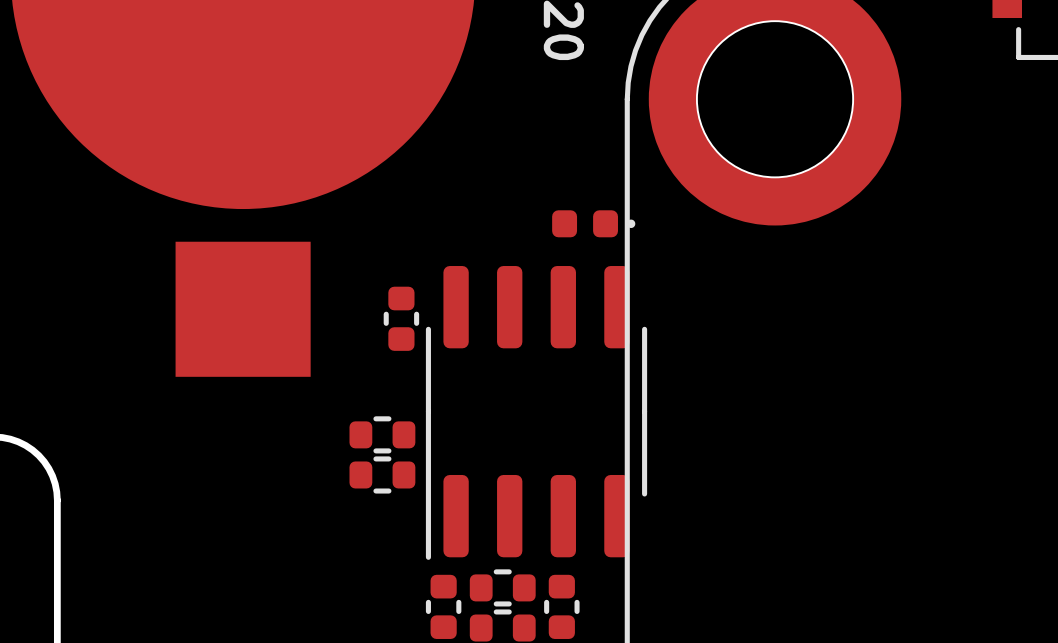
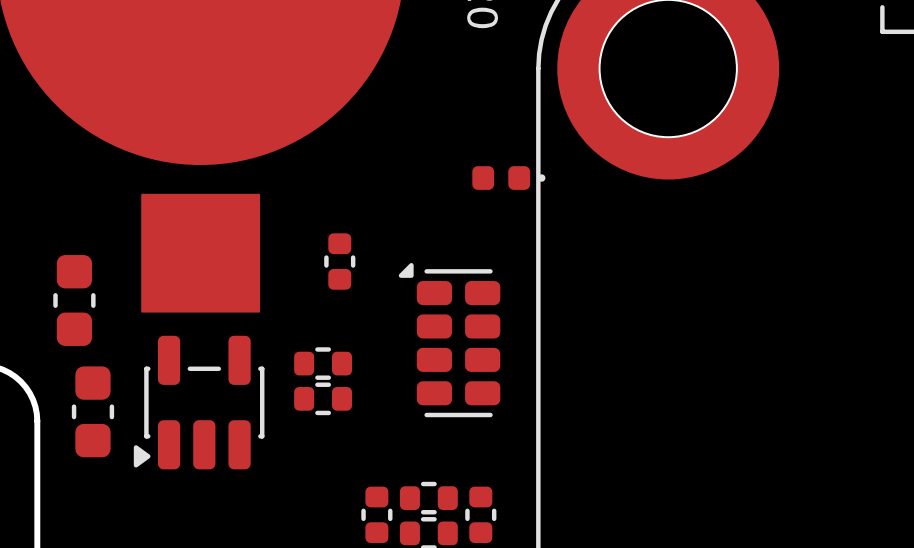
part footprint: [425, 266, 648, 560] -> [398, 263, 501, 418]
part: none -> (74, 300)
part: none -> (199, 402)
part: none -> (92, 411)

